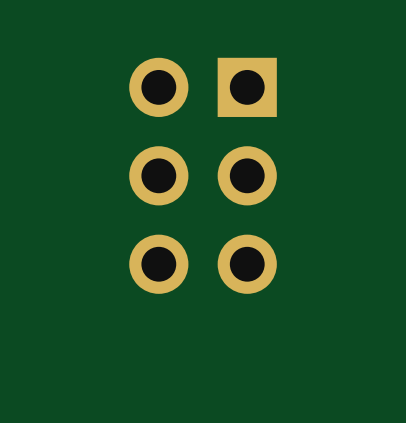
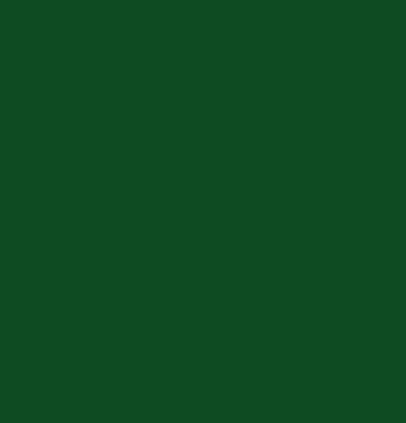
part: (203, 175) -> none

